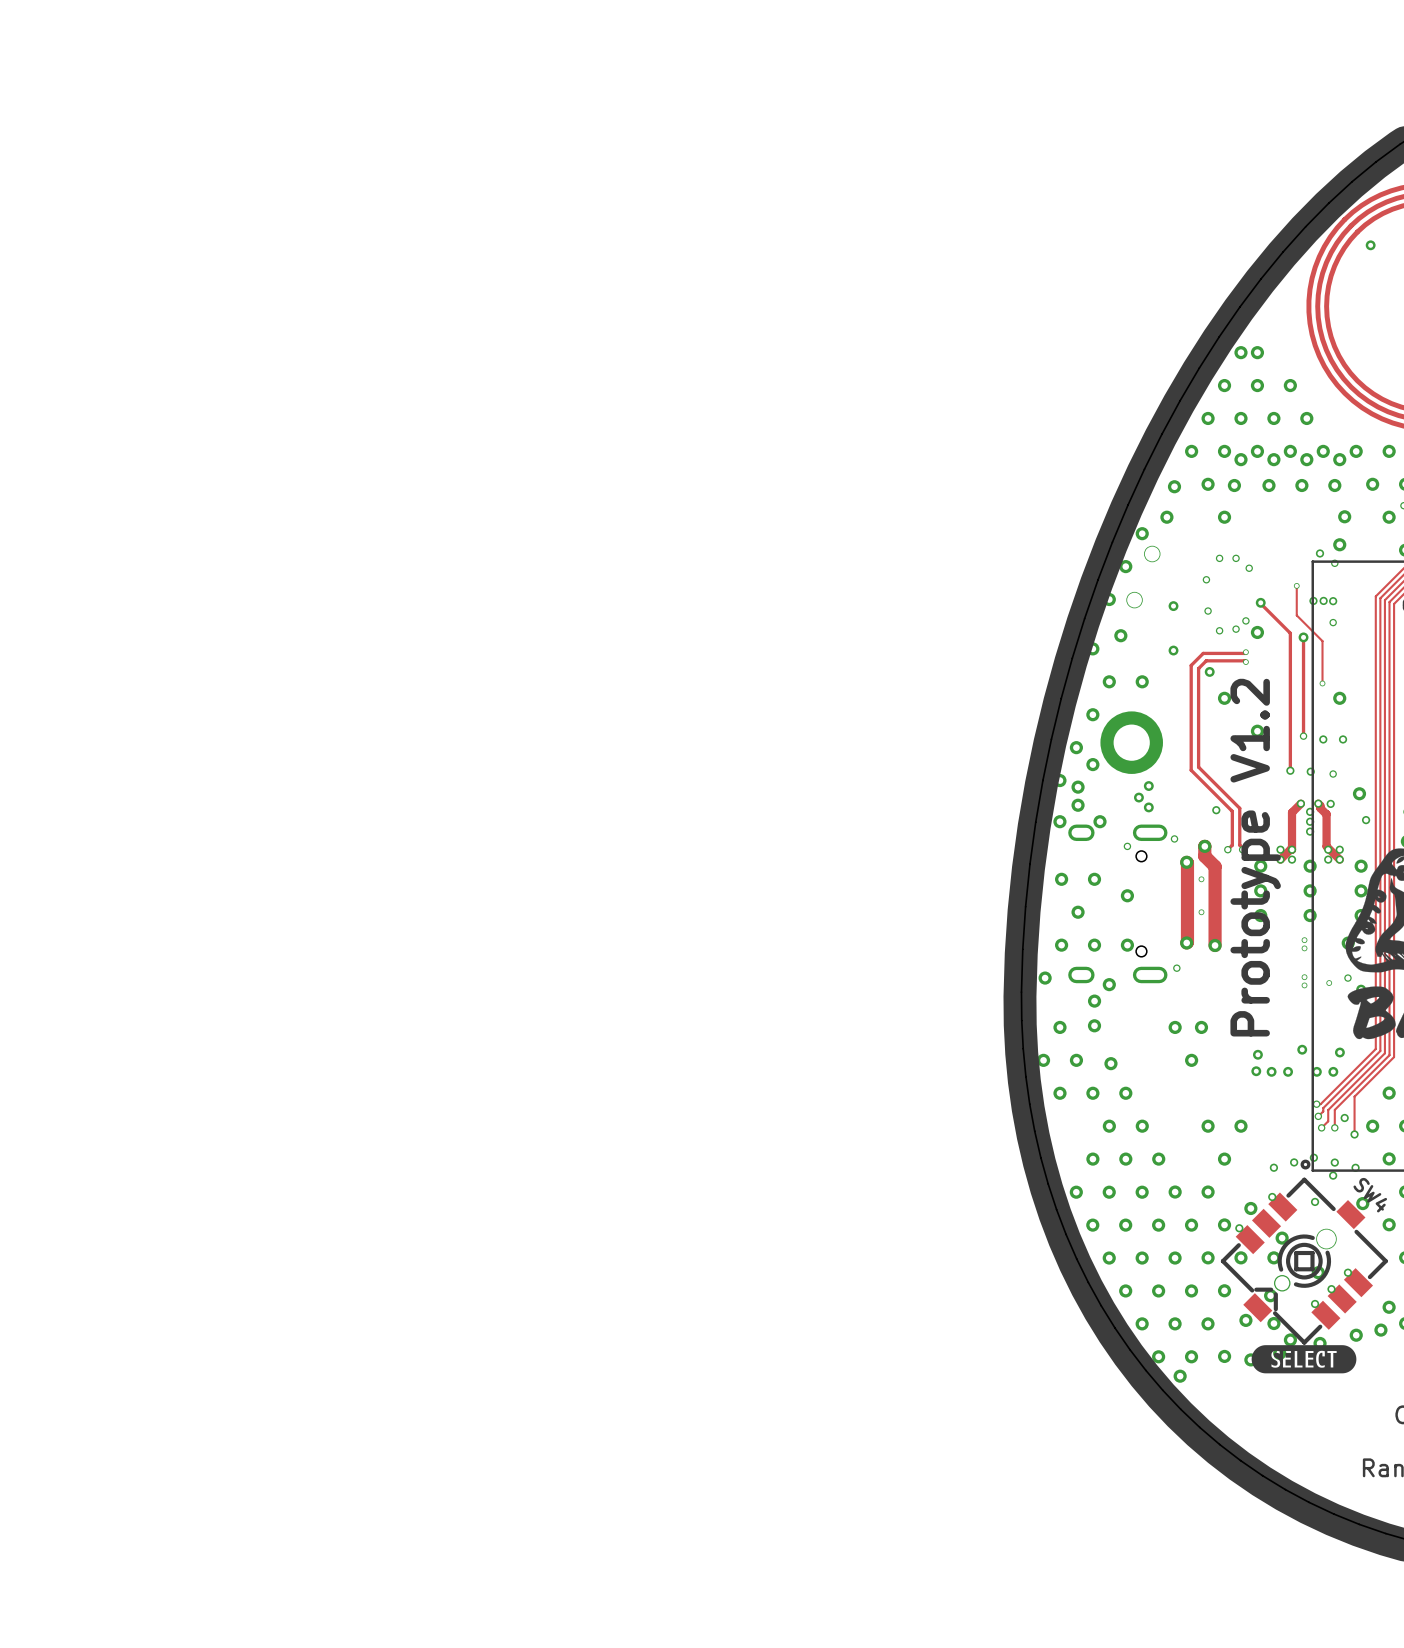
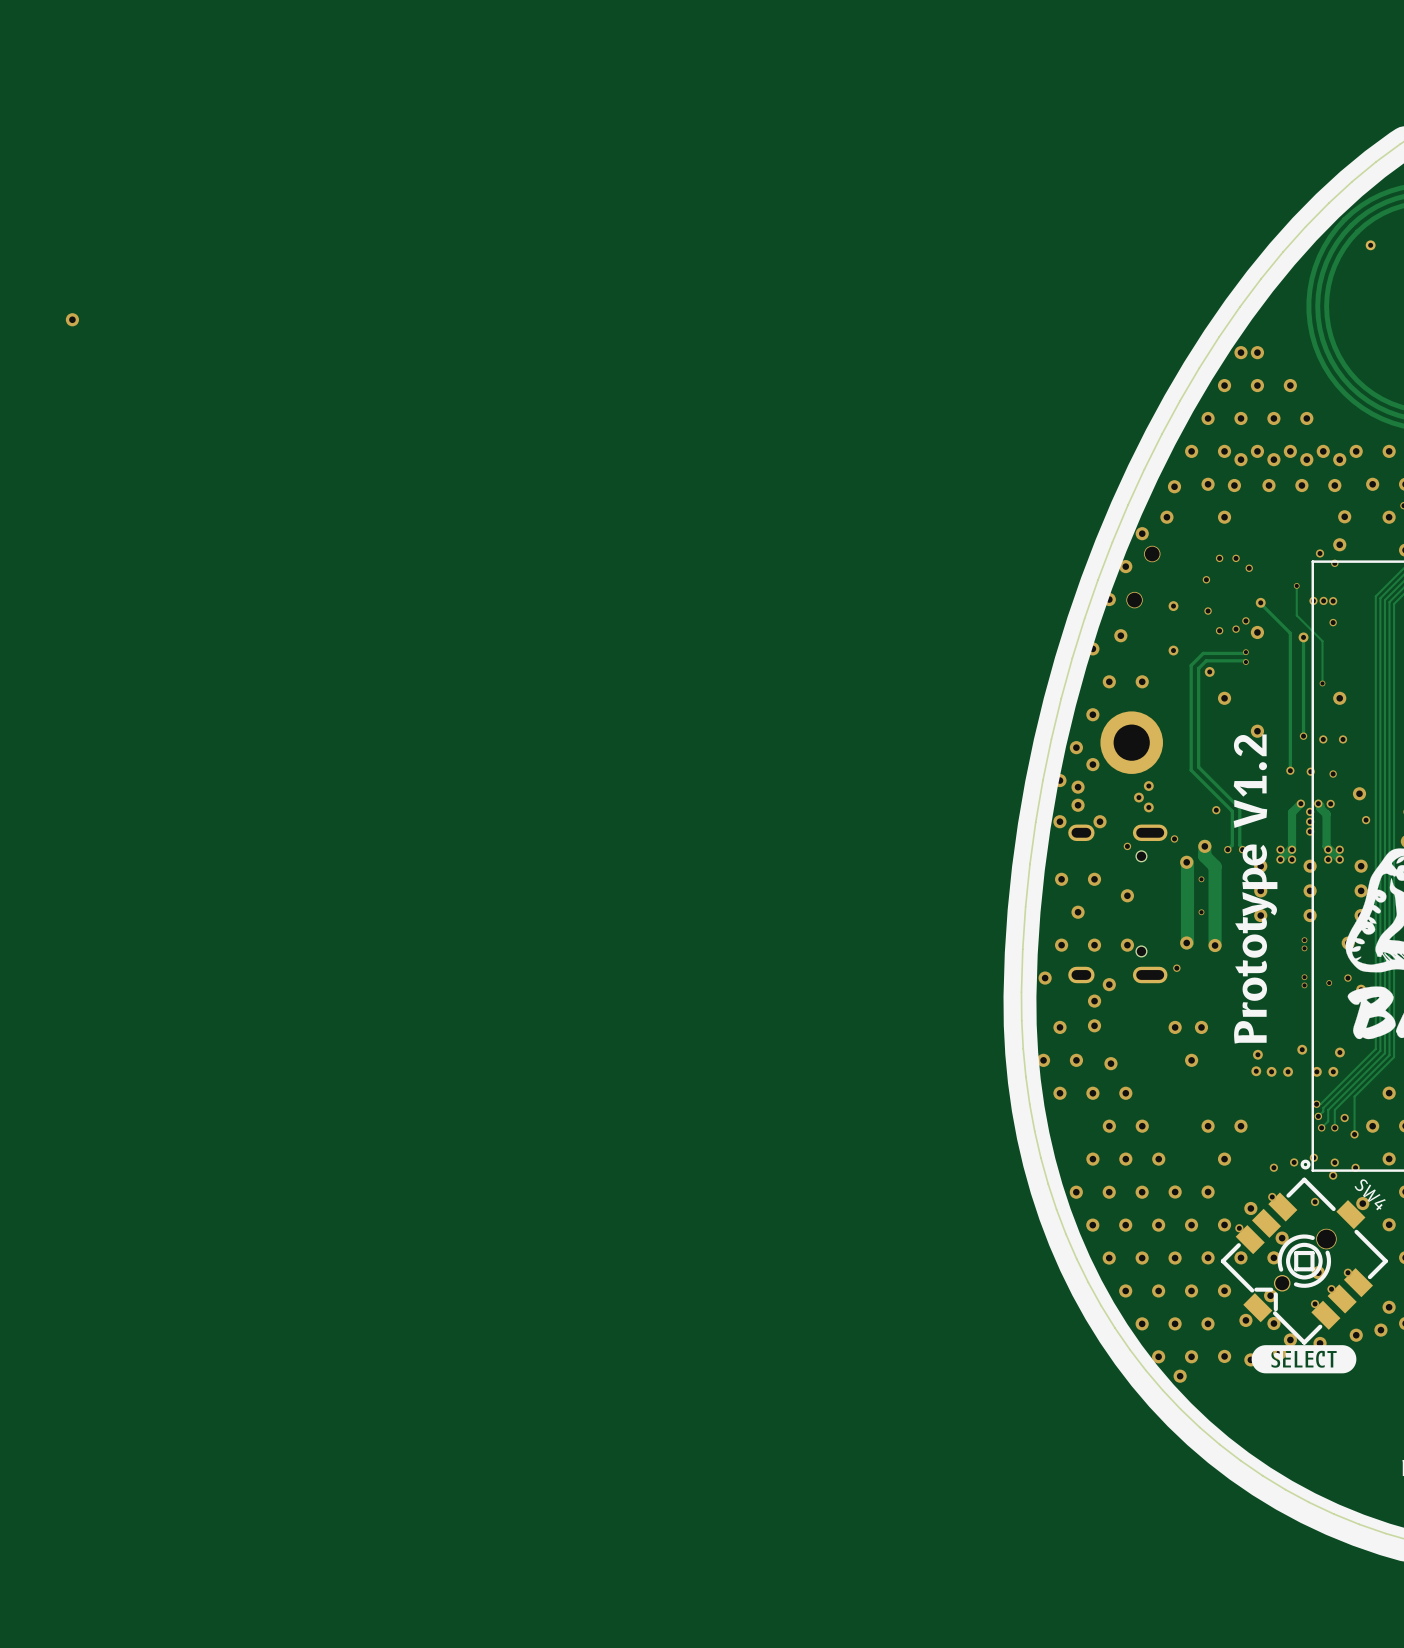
via: none -> (72, 319)

